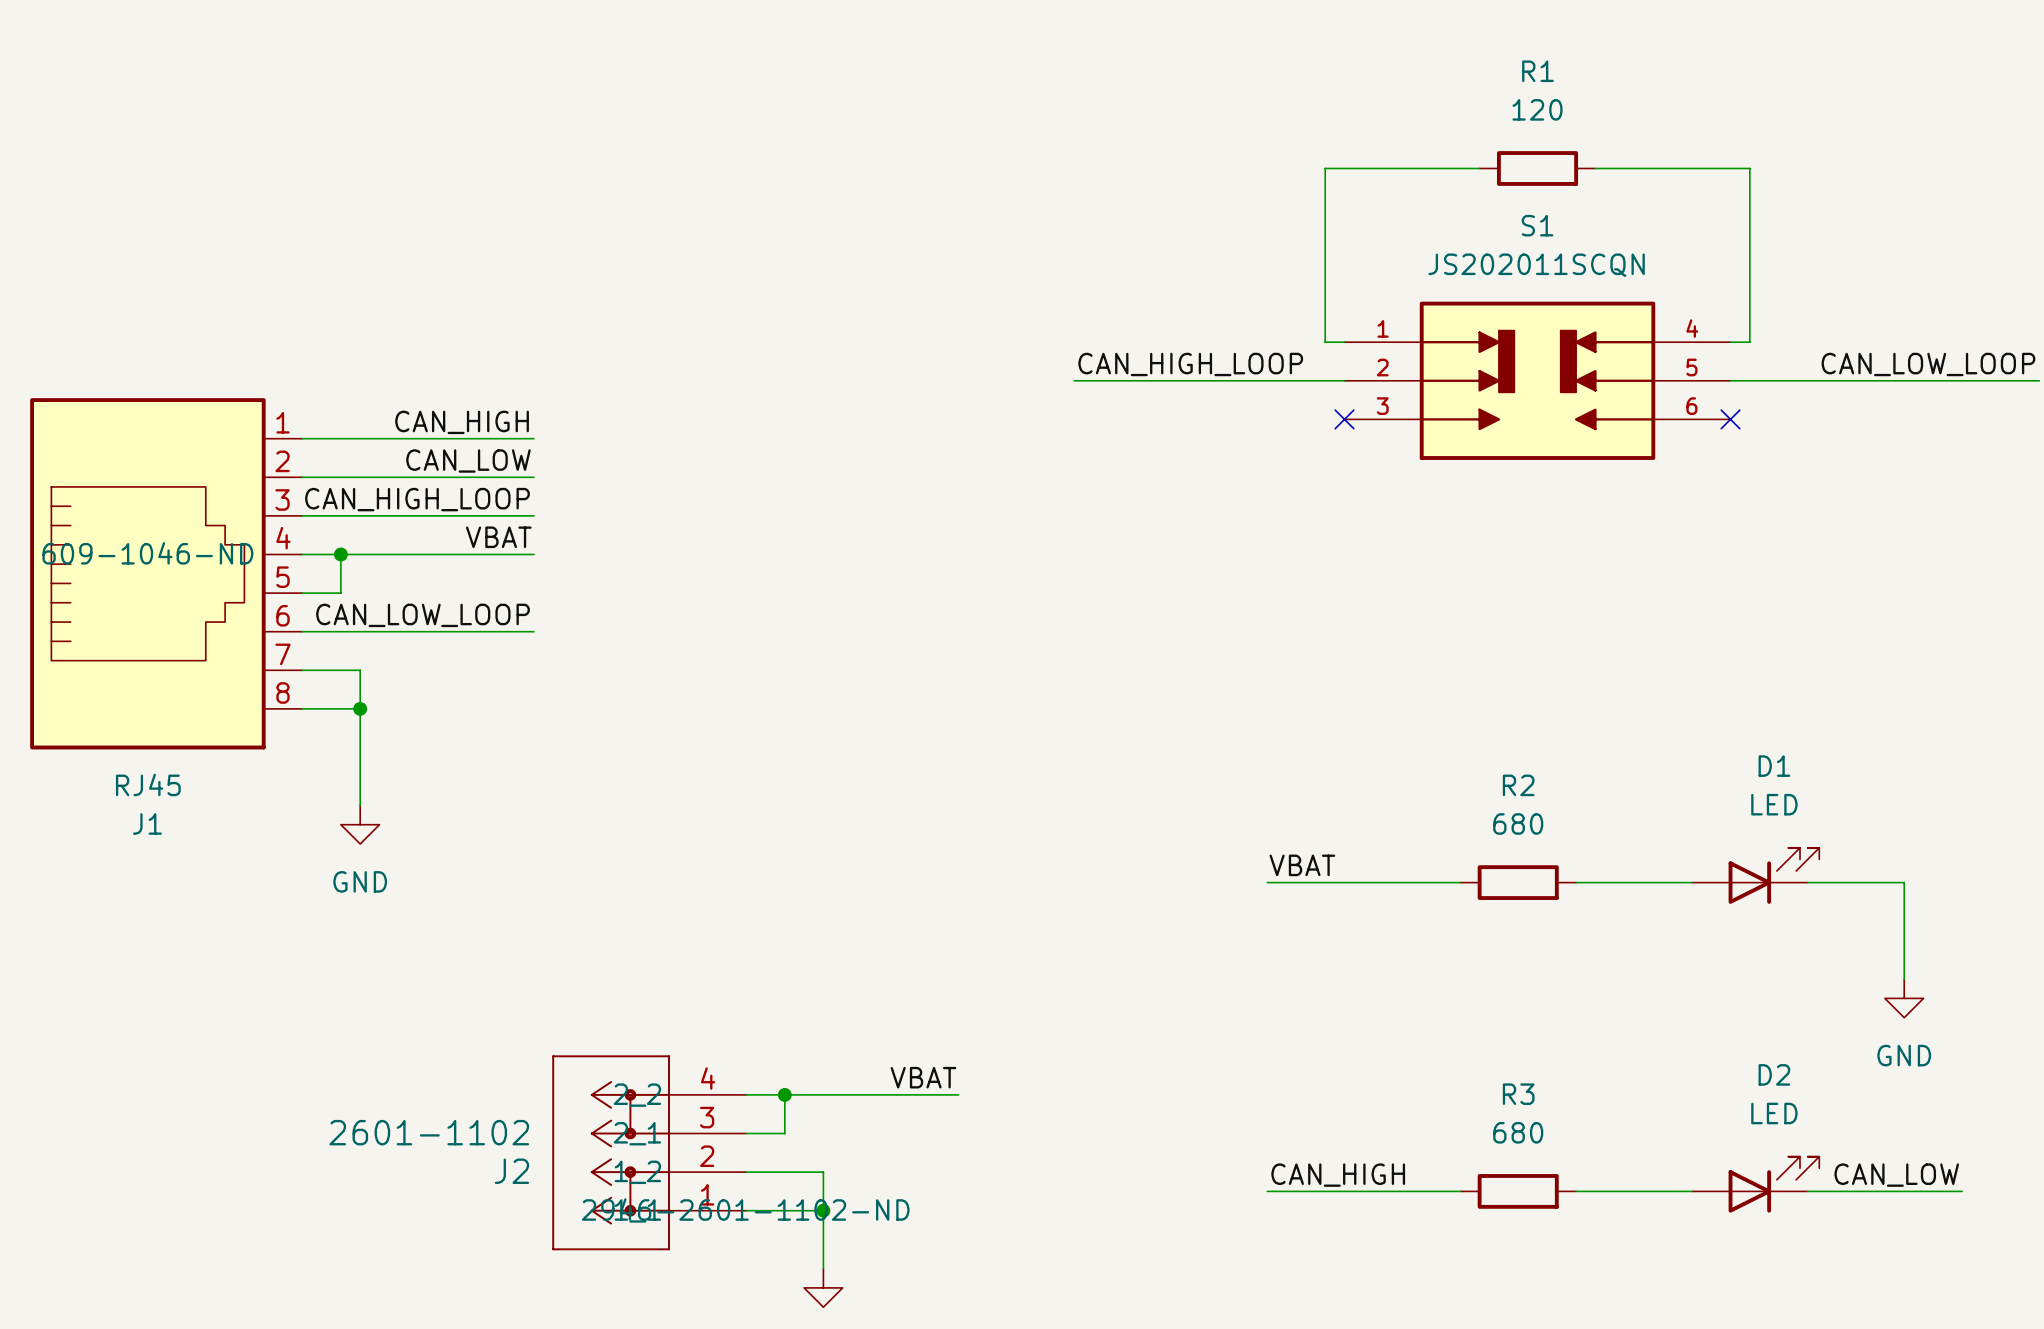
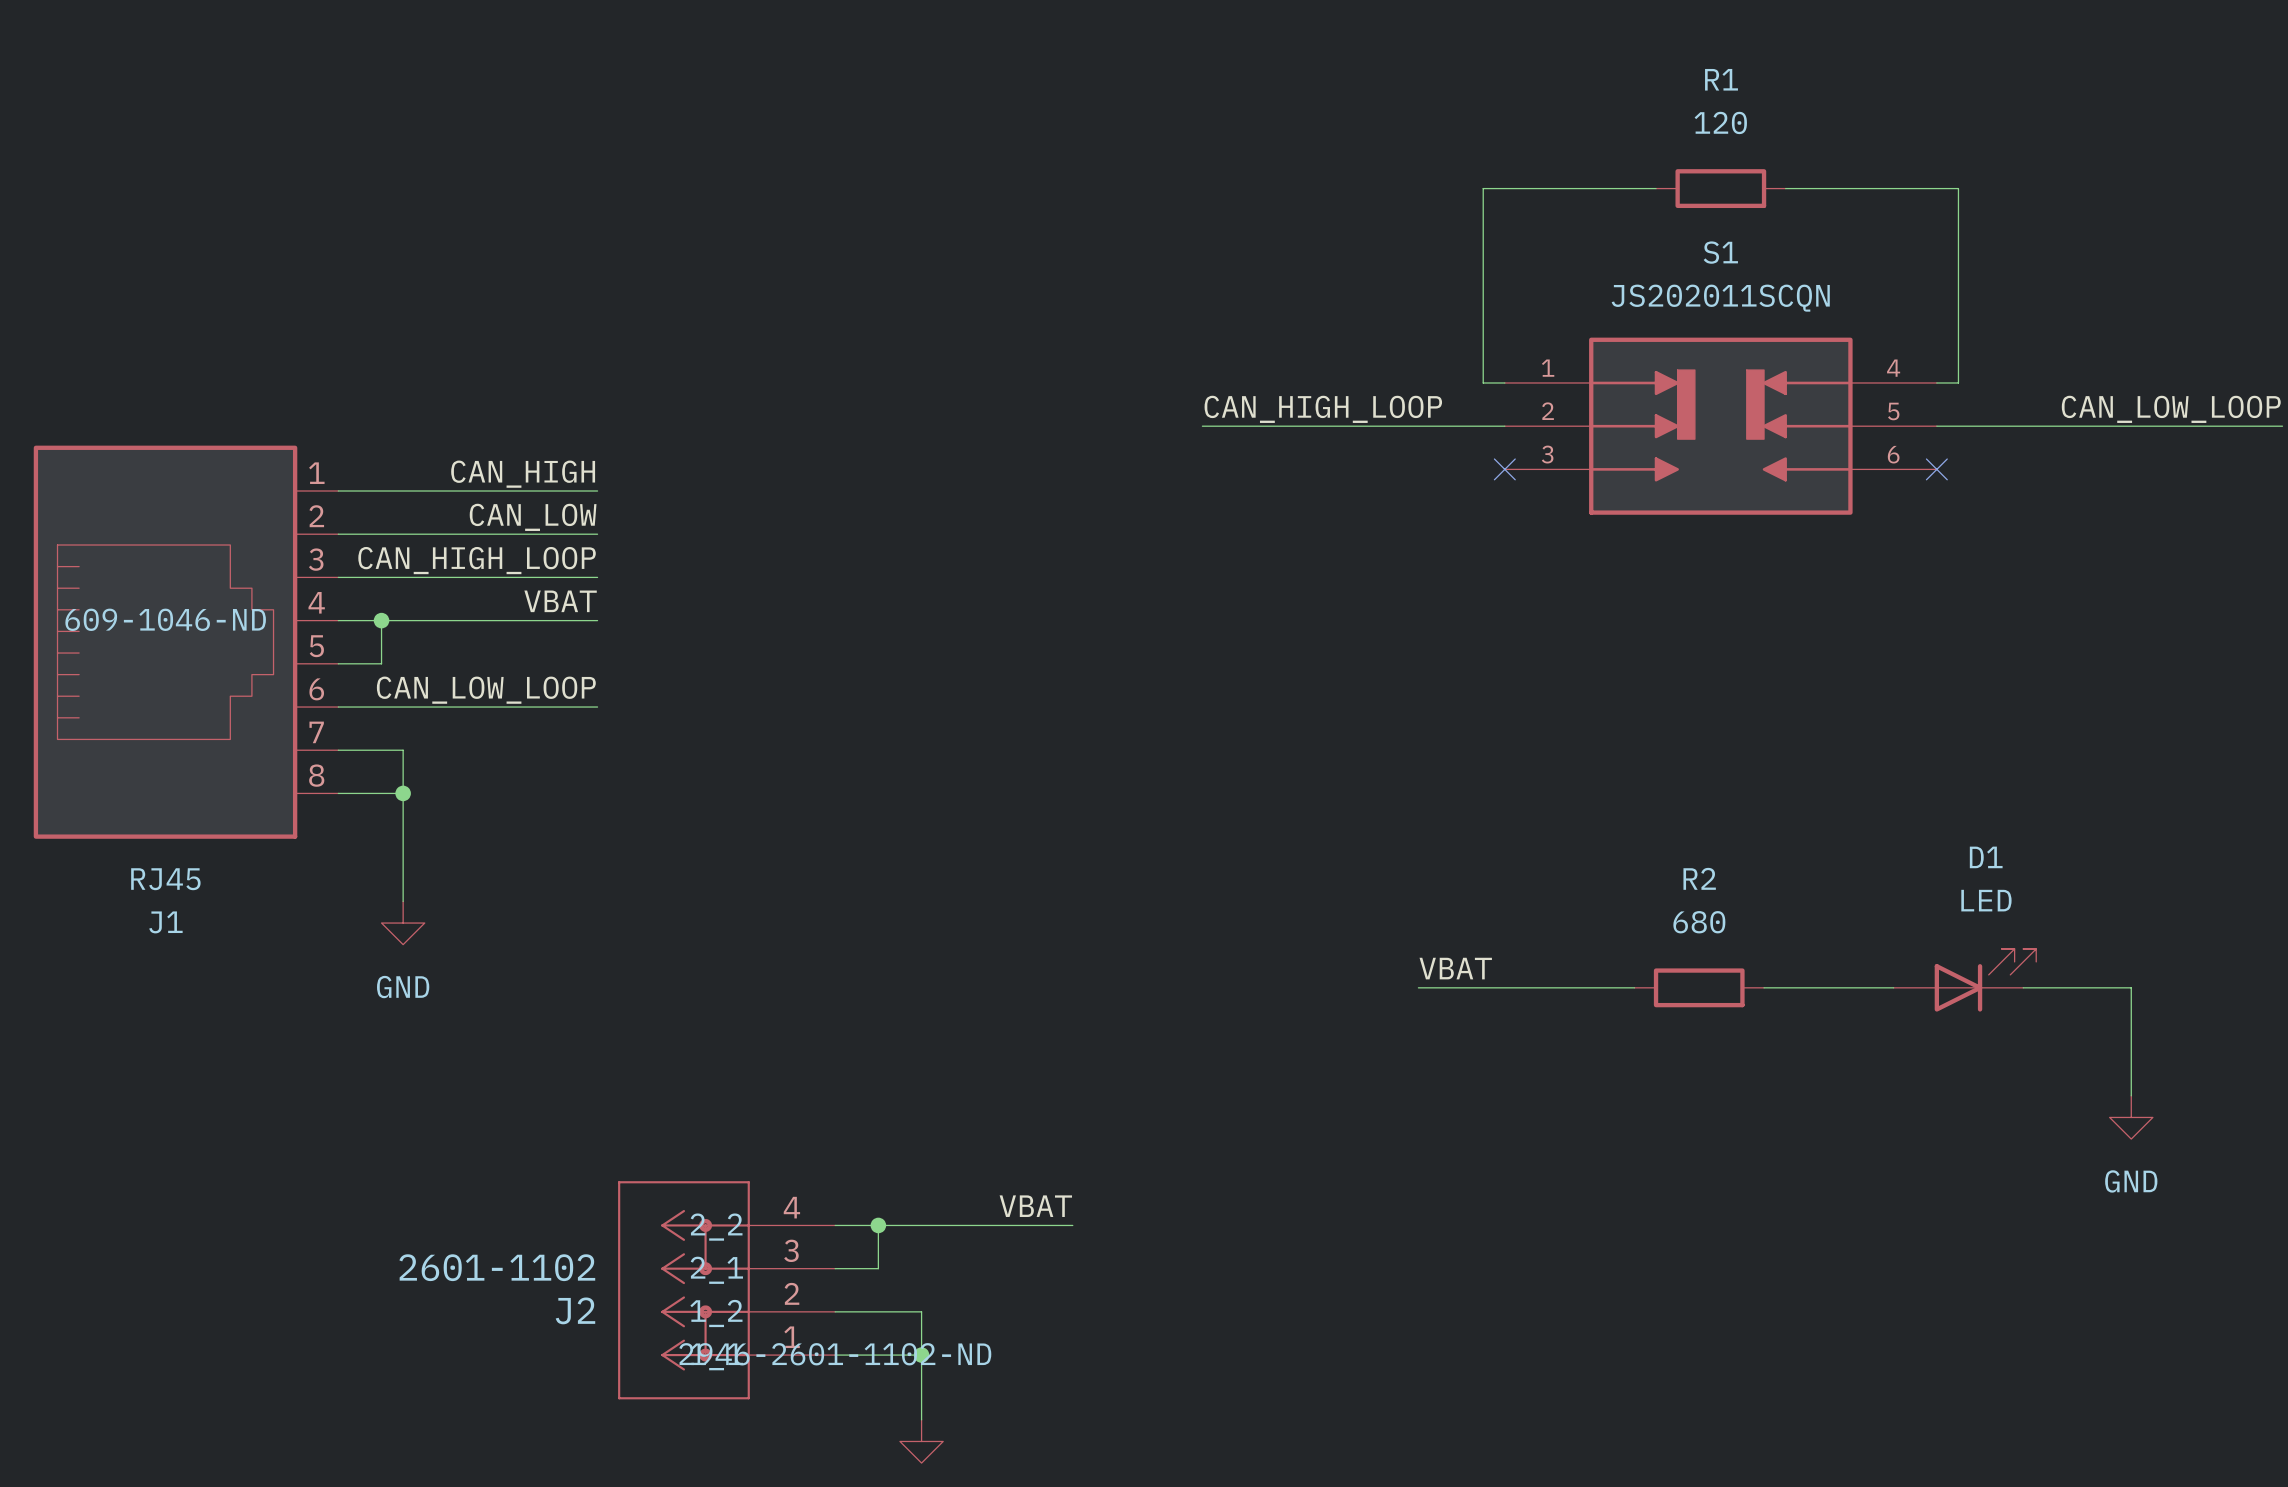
label: CAN_HIGH (1338, 1175) -> none
label: CAN_LOW (1896, 1175) -> none
D2: LED (1755, 1184) -> none
wire: (1267, 1191) (1460, 1191) -> none
R3: 680 (1518, 1191) -> none
wire: (1576, 1191) (1691, 1191) -> none
wire: (1807, 1191) (1962, 1191) -> none

